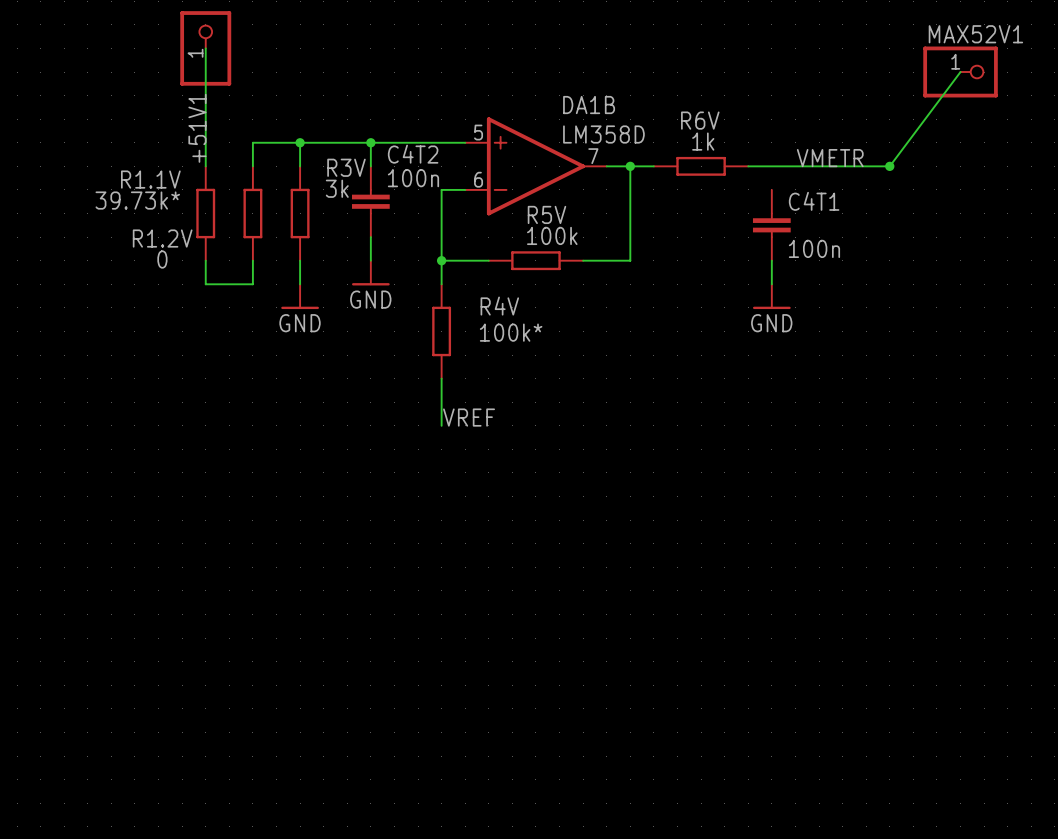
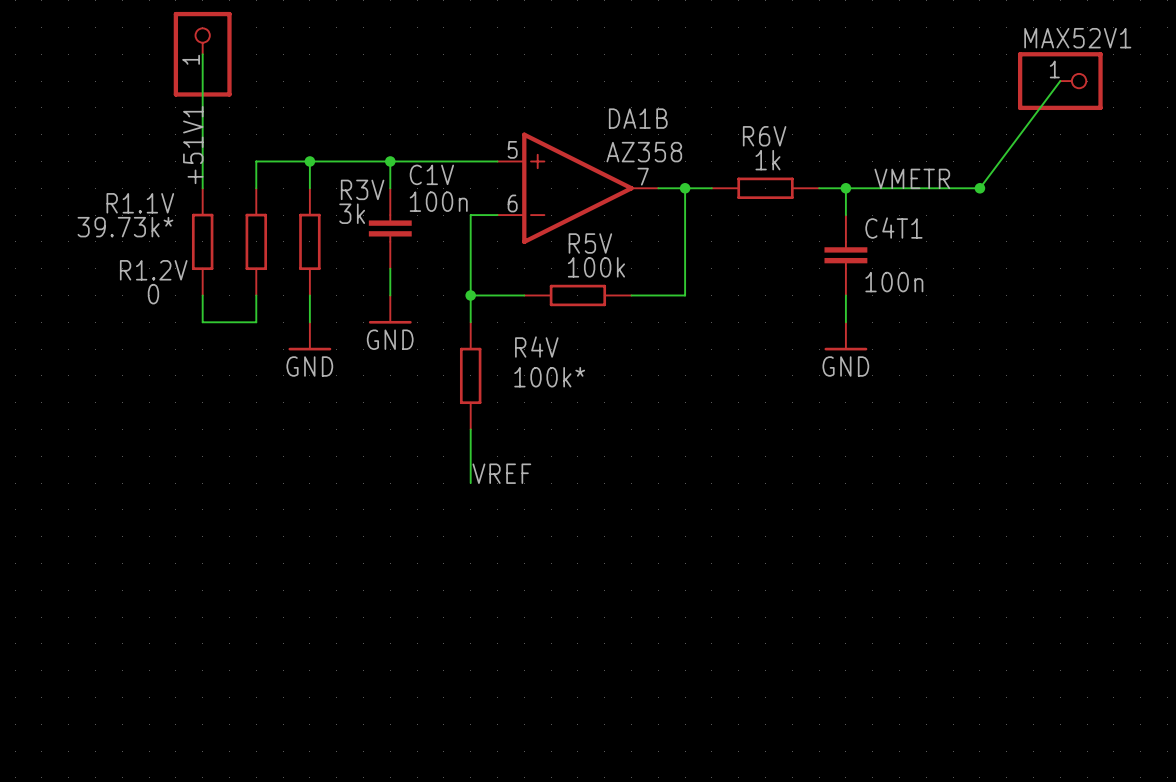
DA1B value: LM358D (603, 134) -> AZ358 (644, 152)
C4T2 name: C4T2 (413, 154) -> C1V (431, 174)
wire: none -> (845, 188) (845, 215)
junction: none -> (845, 188)

